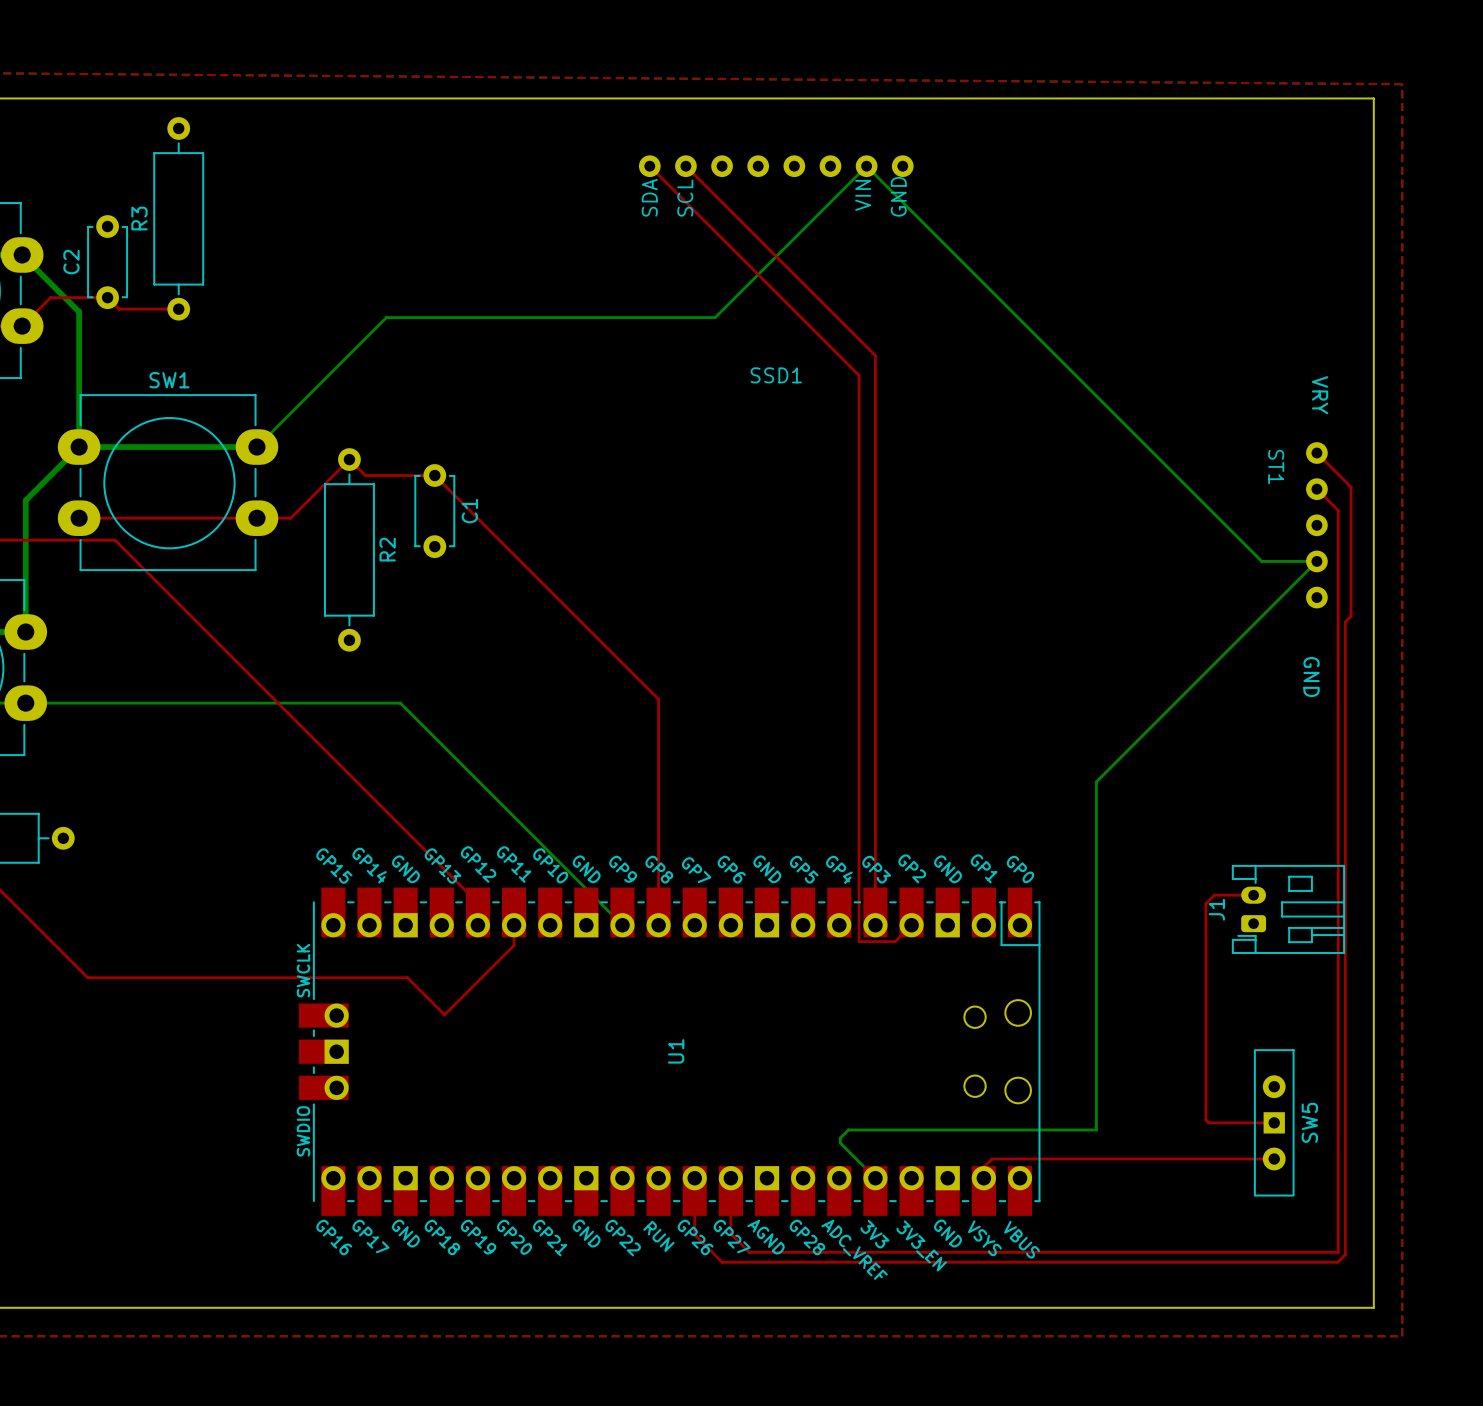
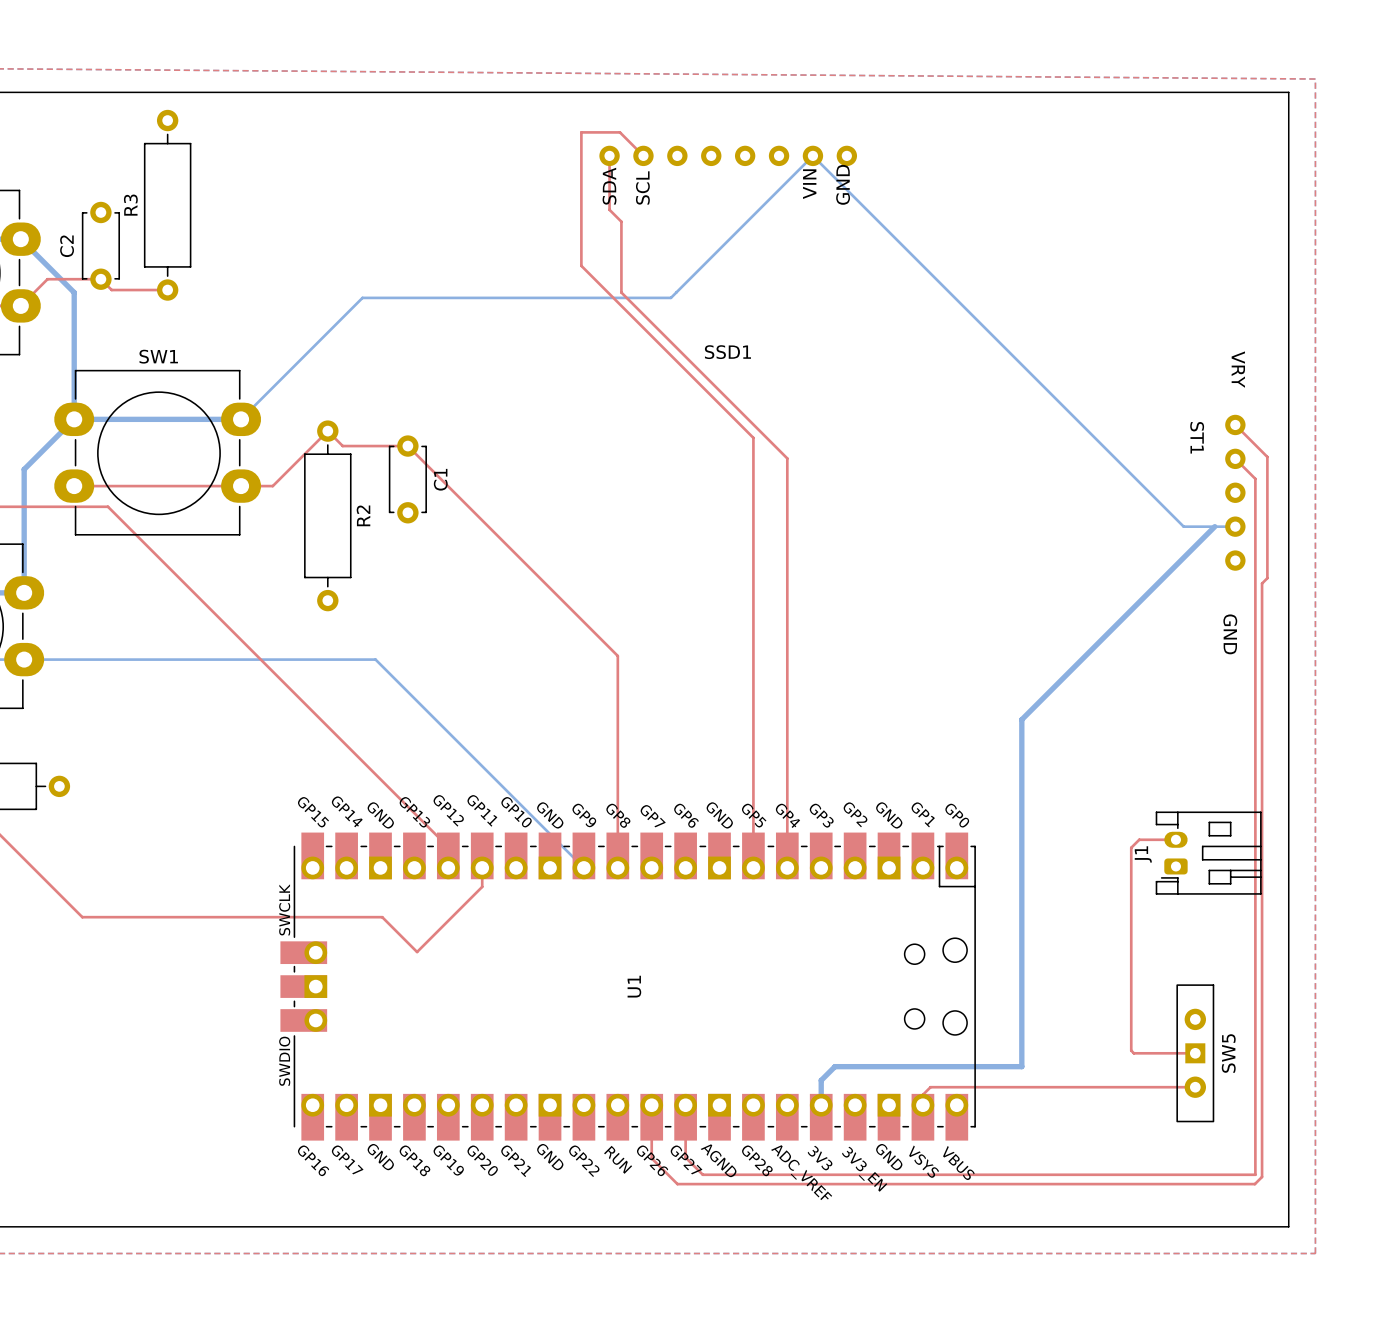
top track: (649, 166) (859, 375) (859, 941) (895, 941) (911, 925) -> (609, 155) (609, 209) (621, 221) (621, 292) (787, 458) (787, 867)
top track: (685, 166) (875, 355) (875, 925) -> (643, 155) (619, 132) (581, 132) (581, 265) (753, 437) (753, 867)
bottom track: (1316, 561) (1096, 781) (1096, 1129) (848, 1129) (840, 1138) (840, 1143) (875, 1178) -> (1214, 526) (1021, 719) (1021, 1066) (834, 1066) (821, 1080) (821, 1105)

